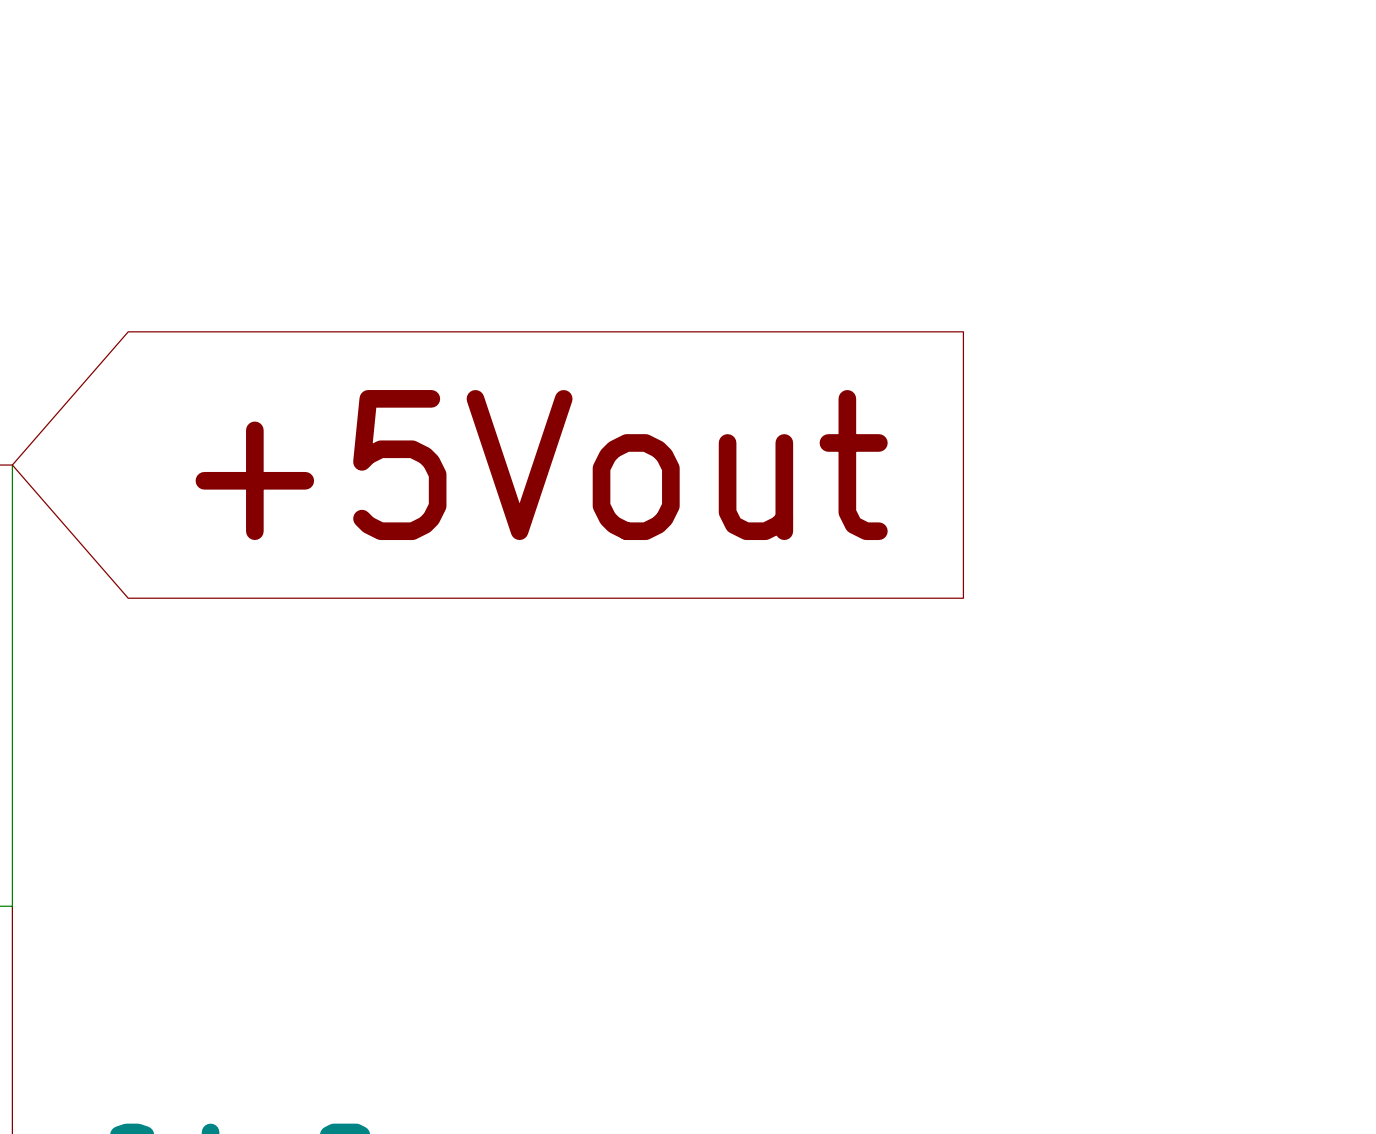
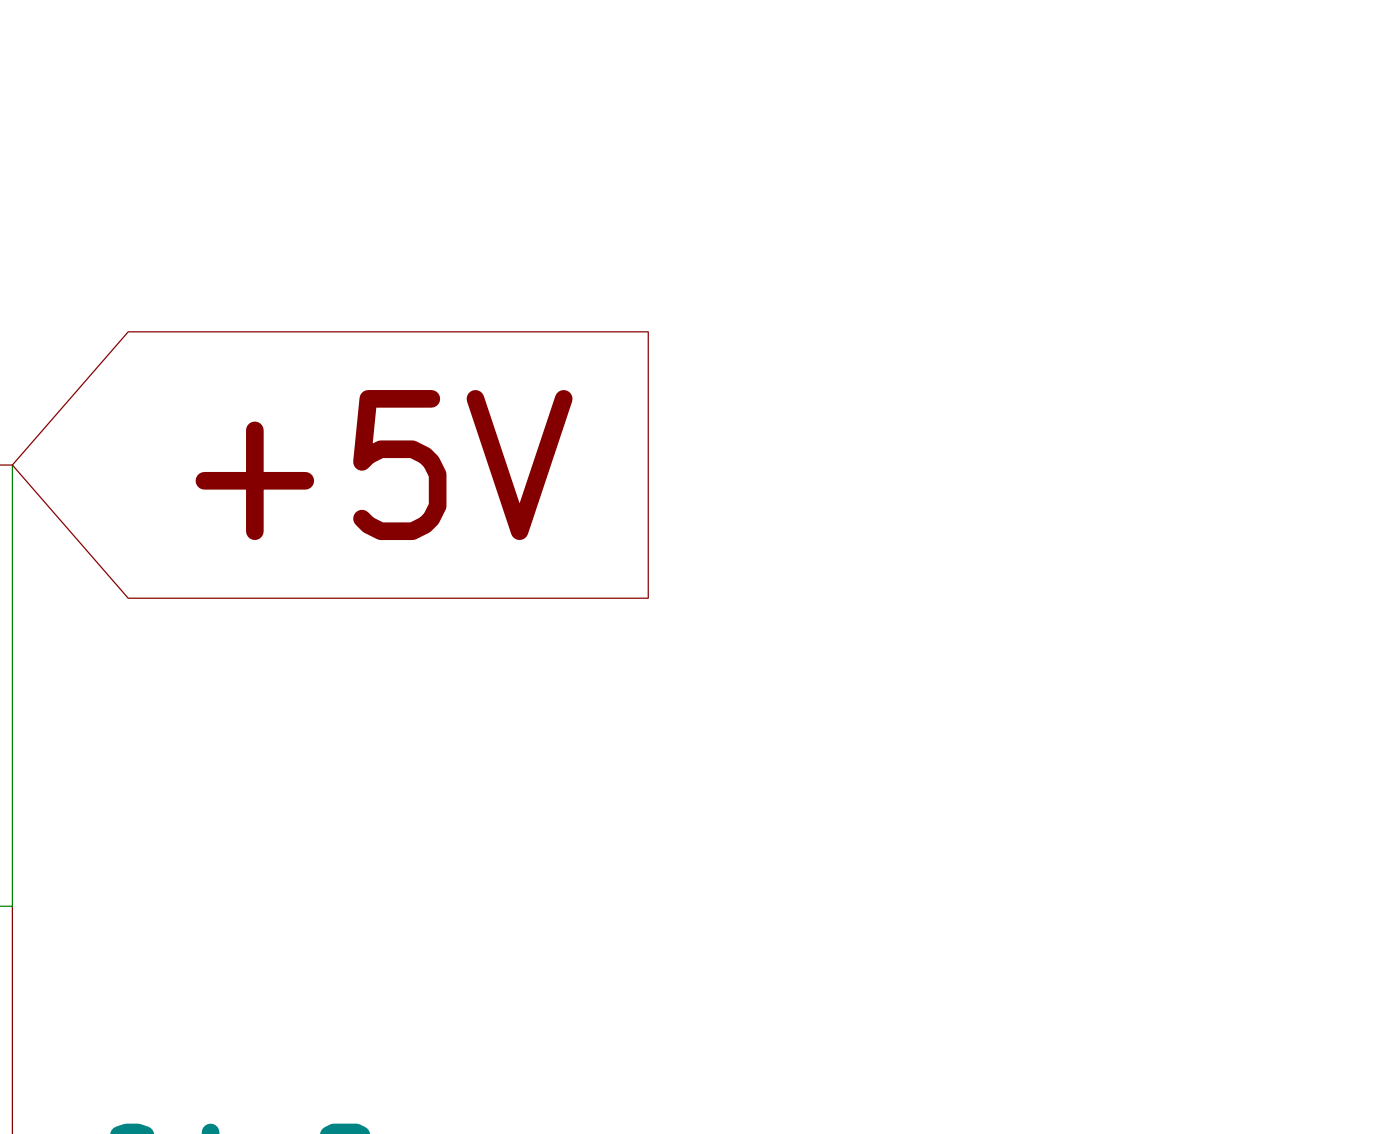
global label: +5Vout (541, 465) -> +5V (384, 465)

